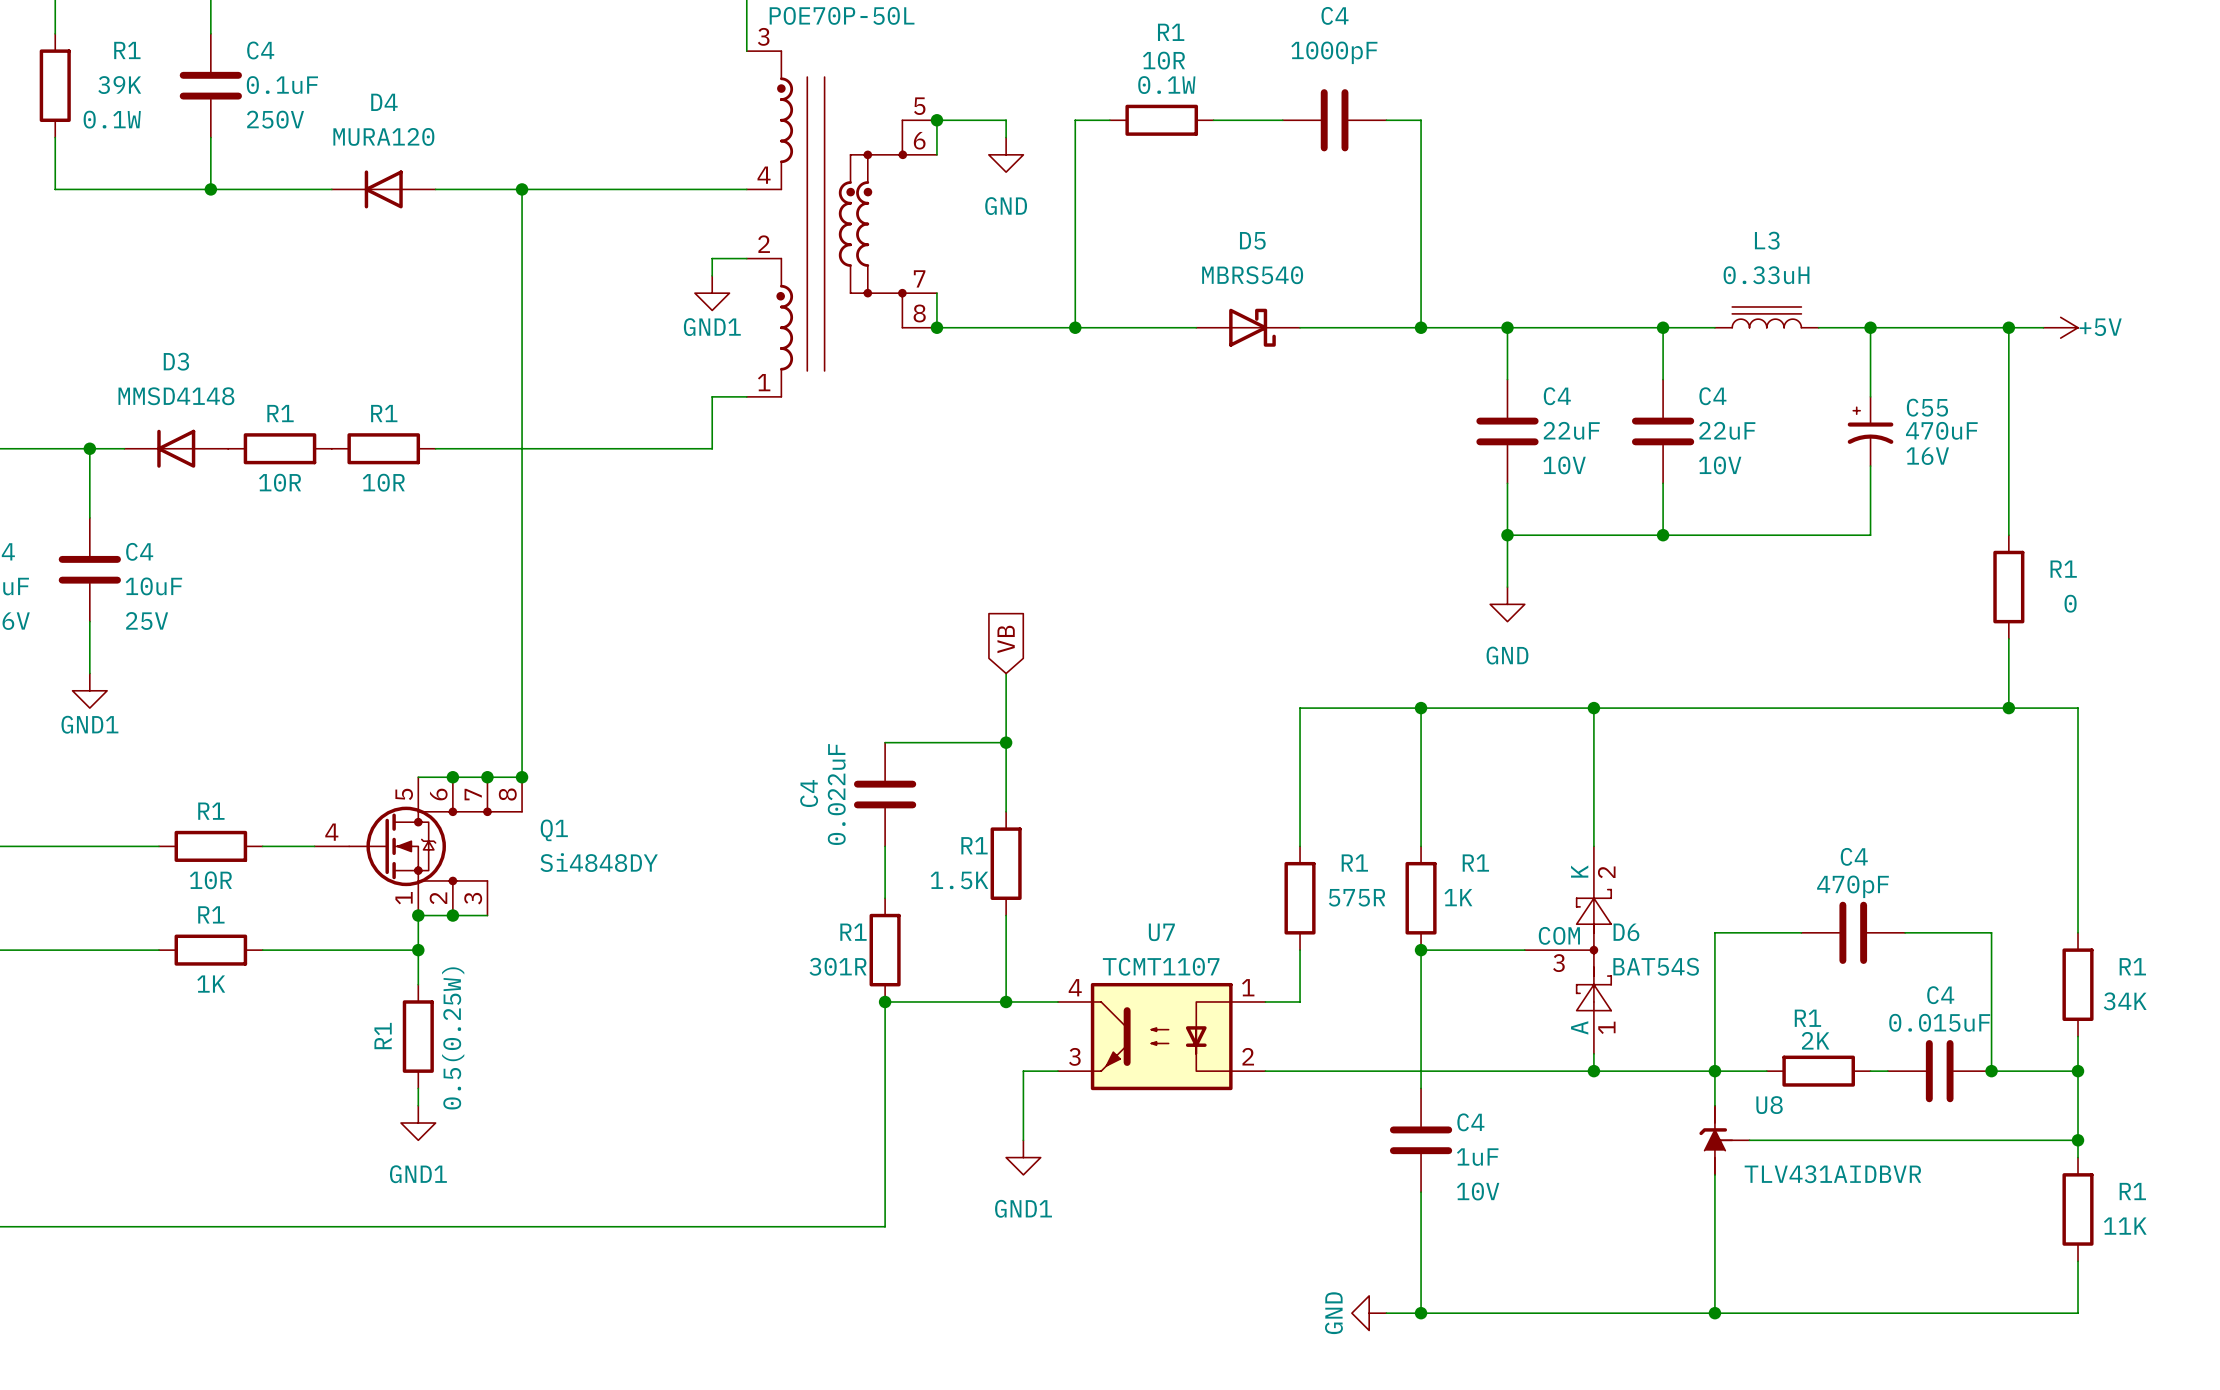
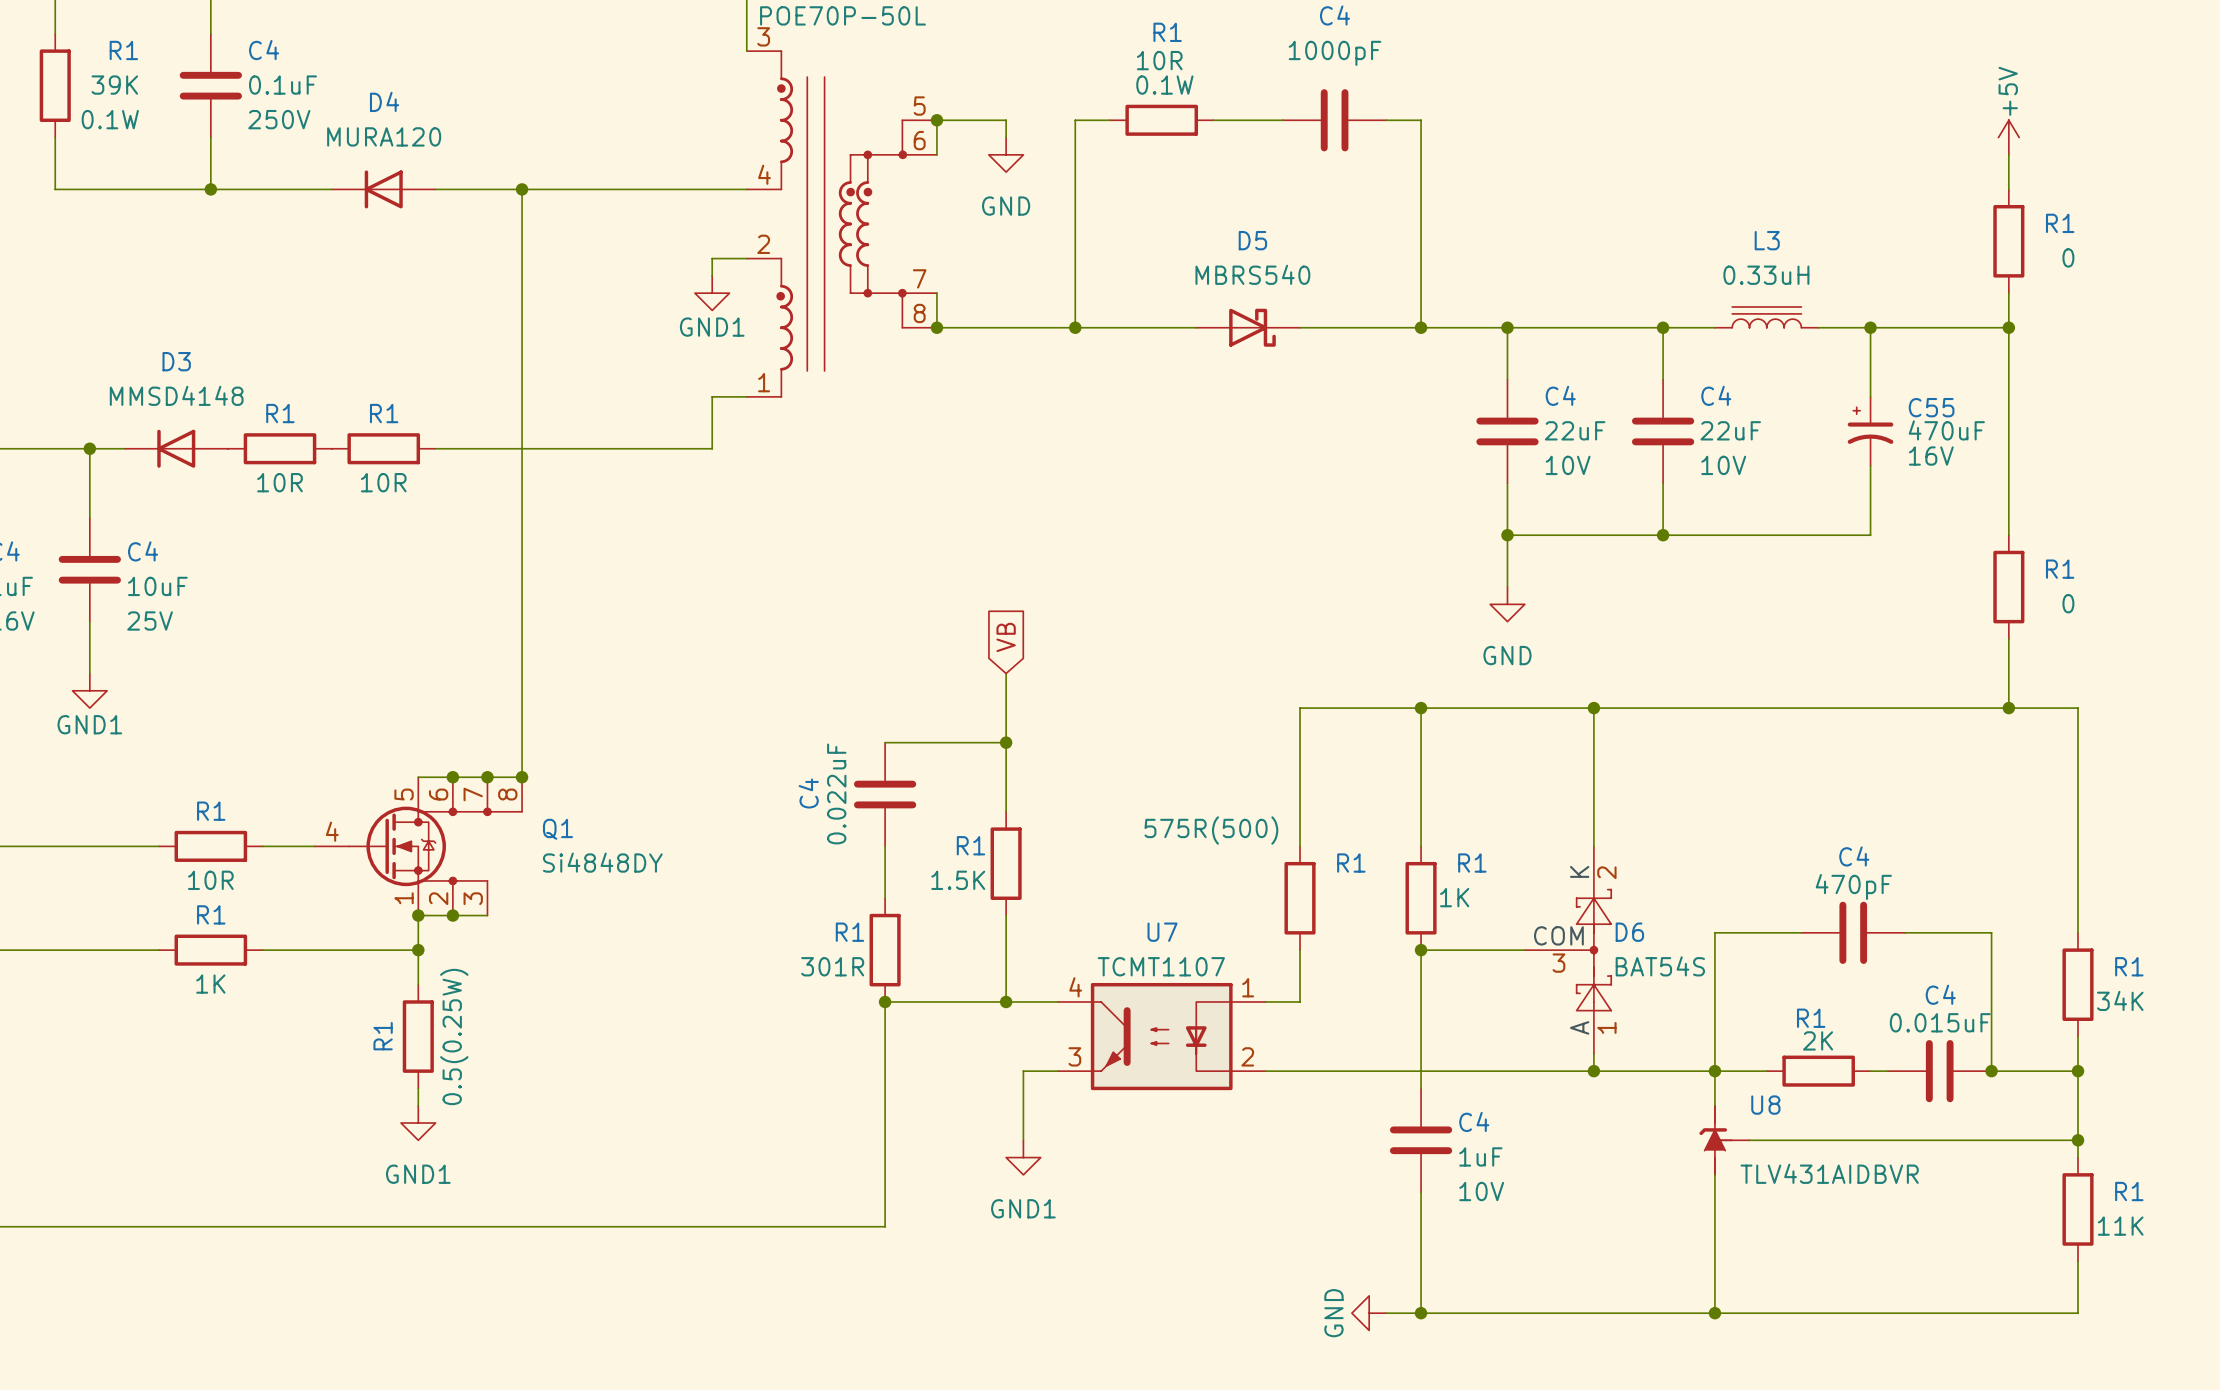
wire: none -> (2008, 154) (2008, 189)
R1: none -> 0 (2008, 241)
wire: (2008, 327) (2043, 327) -> (2008, 327) (2008, 293)
power symbol rotation: 0° (2060, 327) -> 90° counterclockwise (2008, 137)
power symbol position: +5V (2060, 327) -> +5V (2008, 137)
R1 value: 575R (1357, 897) -> 575R(500) (1211, 830)

